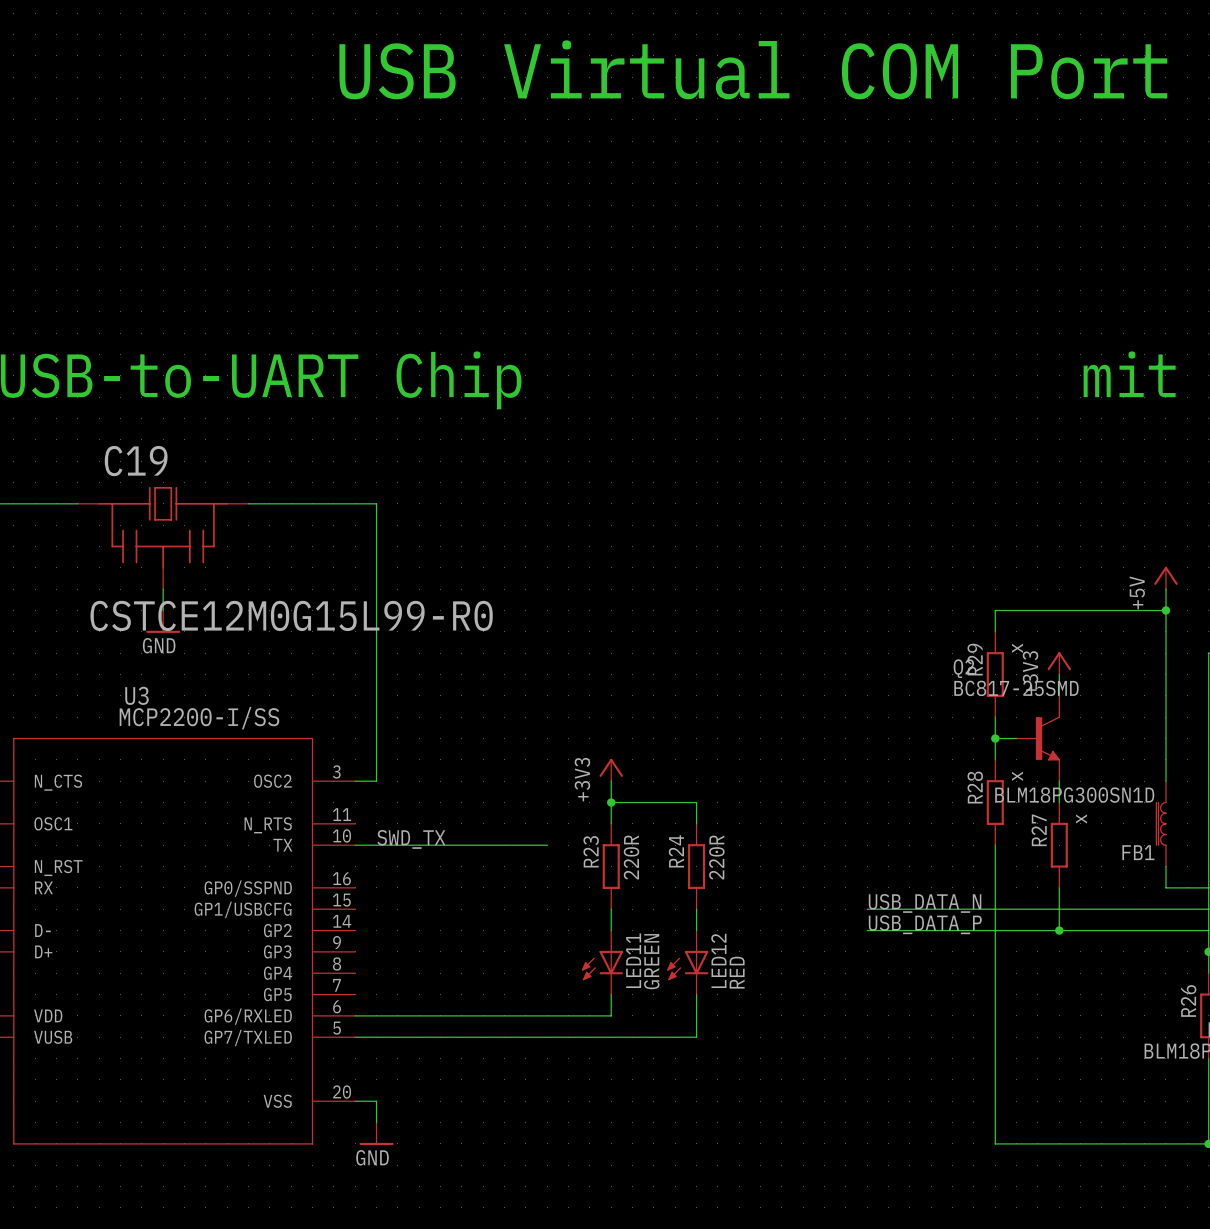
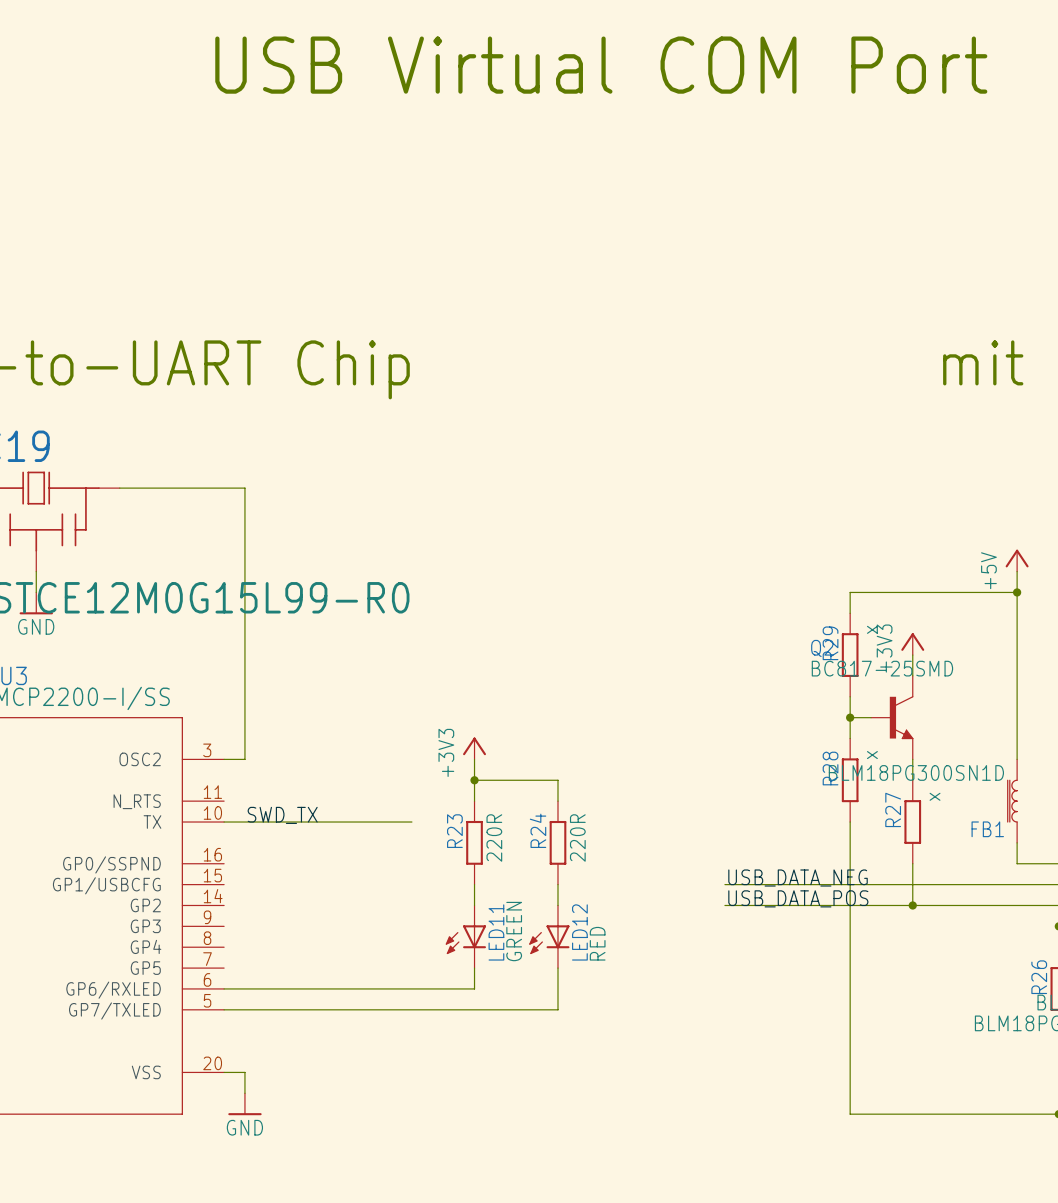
label: USB_DATA_N (925, 903) -> USB_DATA_NEG (798, 878)
label: USB_DATA_P (925, 924) -> USB_DATA_POS (798, 898)

